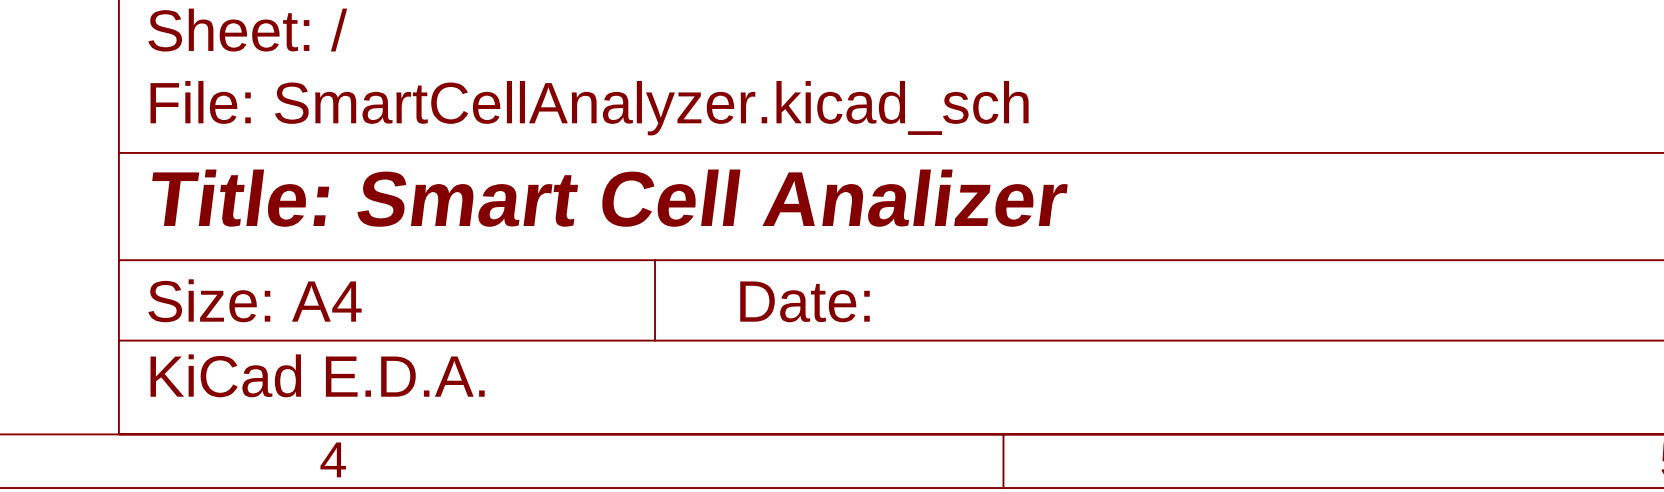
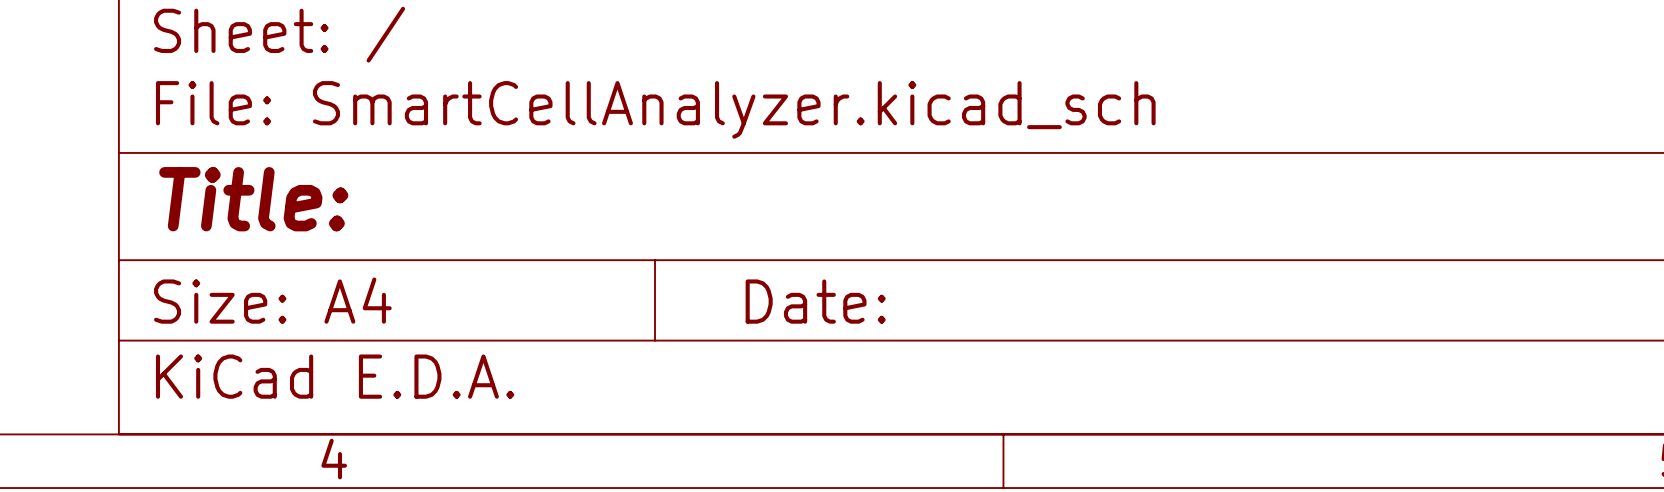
title block: Title: Smart Cell Analizer (609, 198) -> Title: (253, 199)

